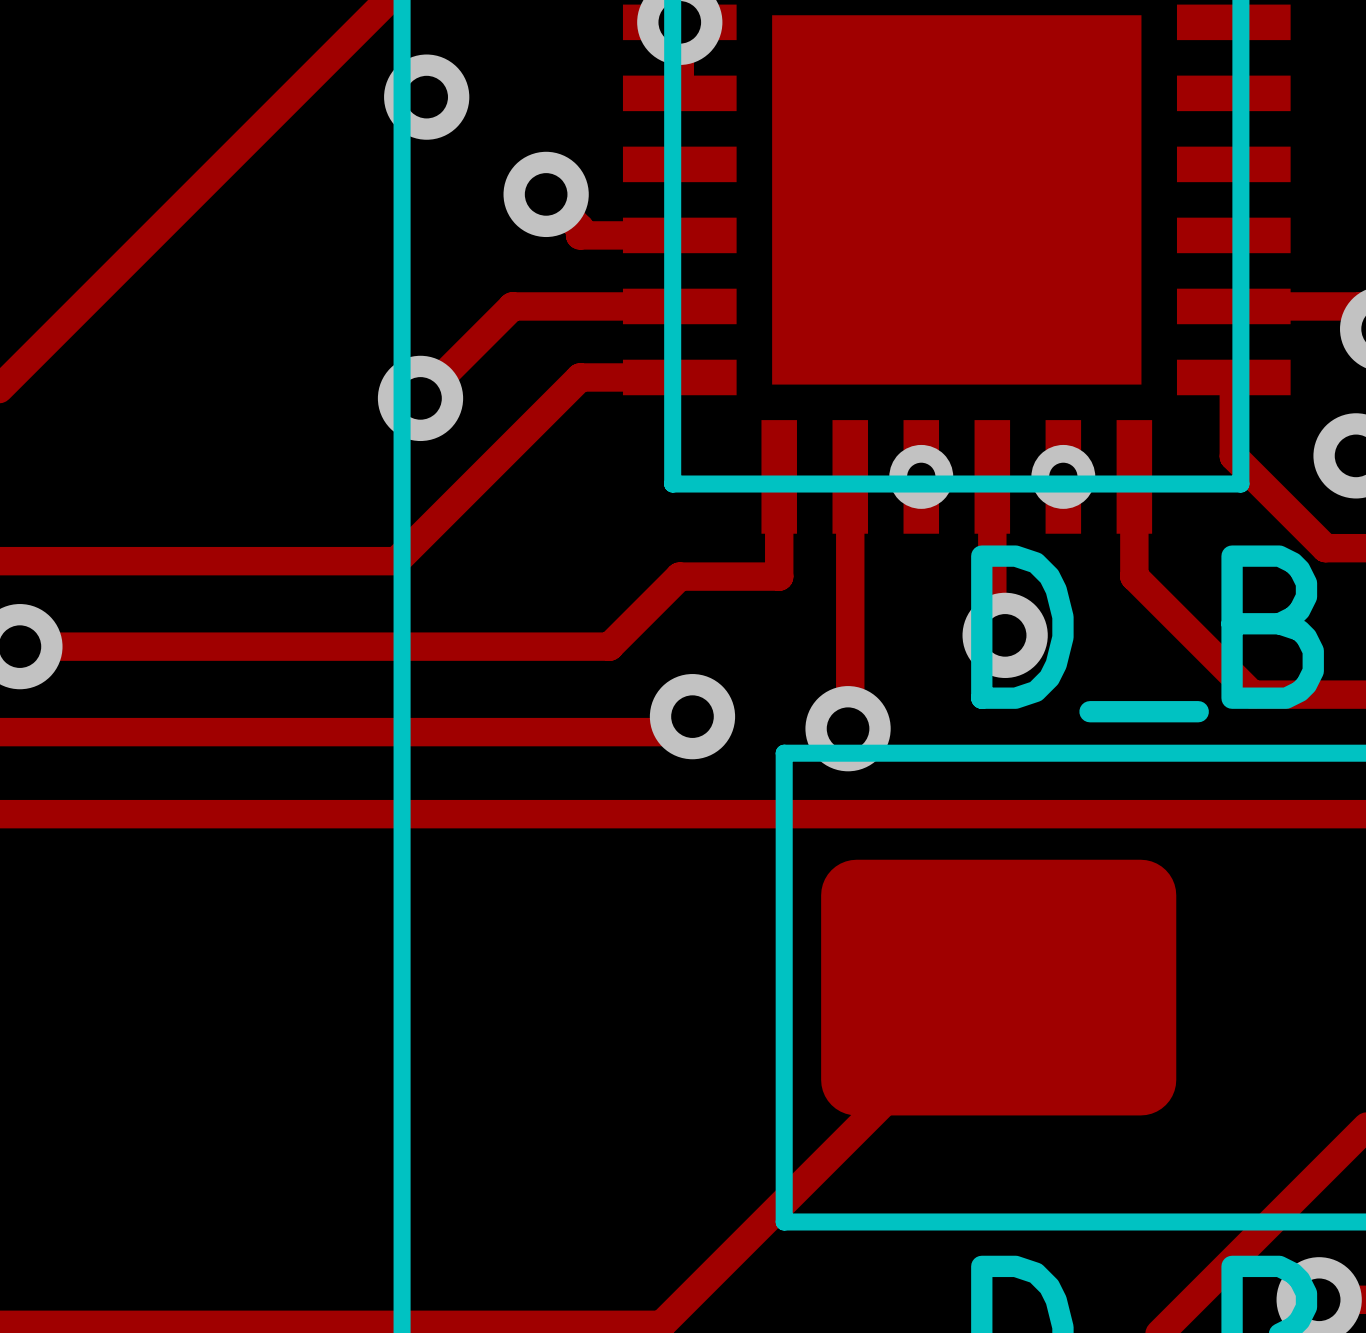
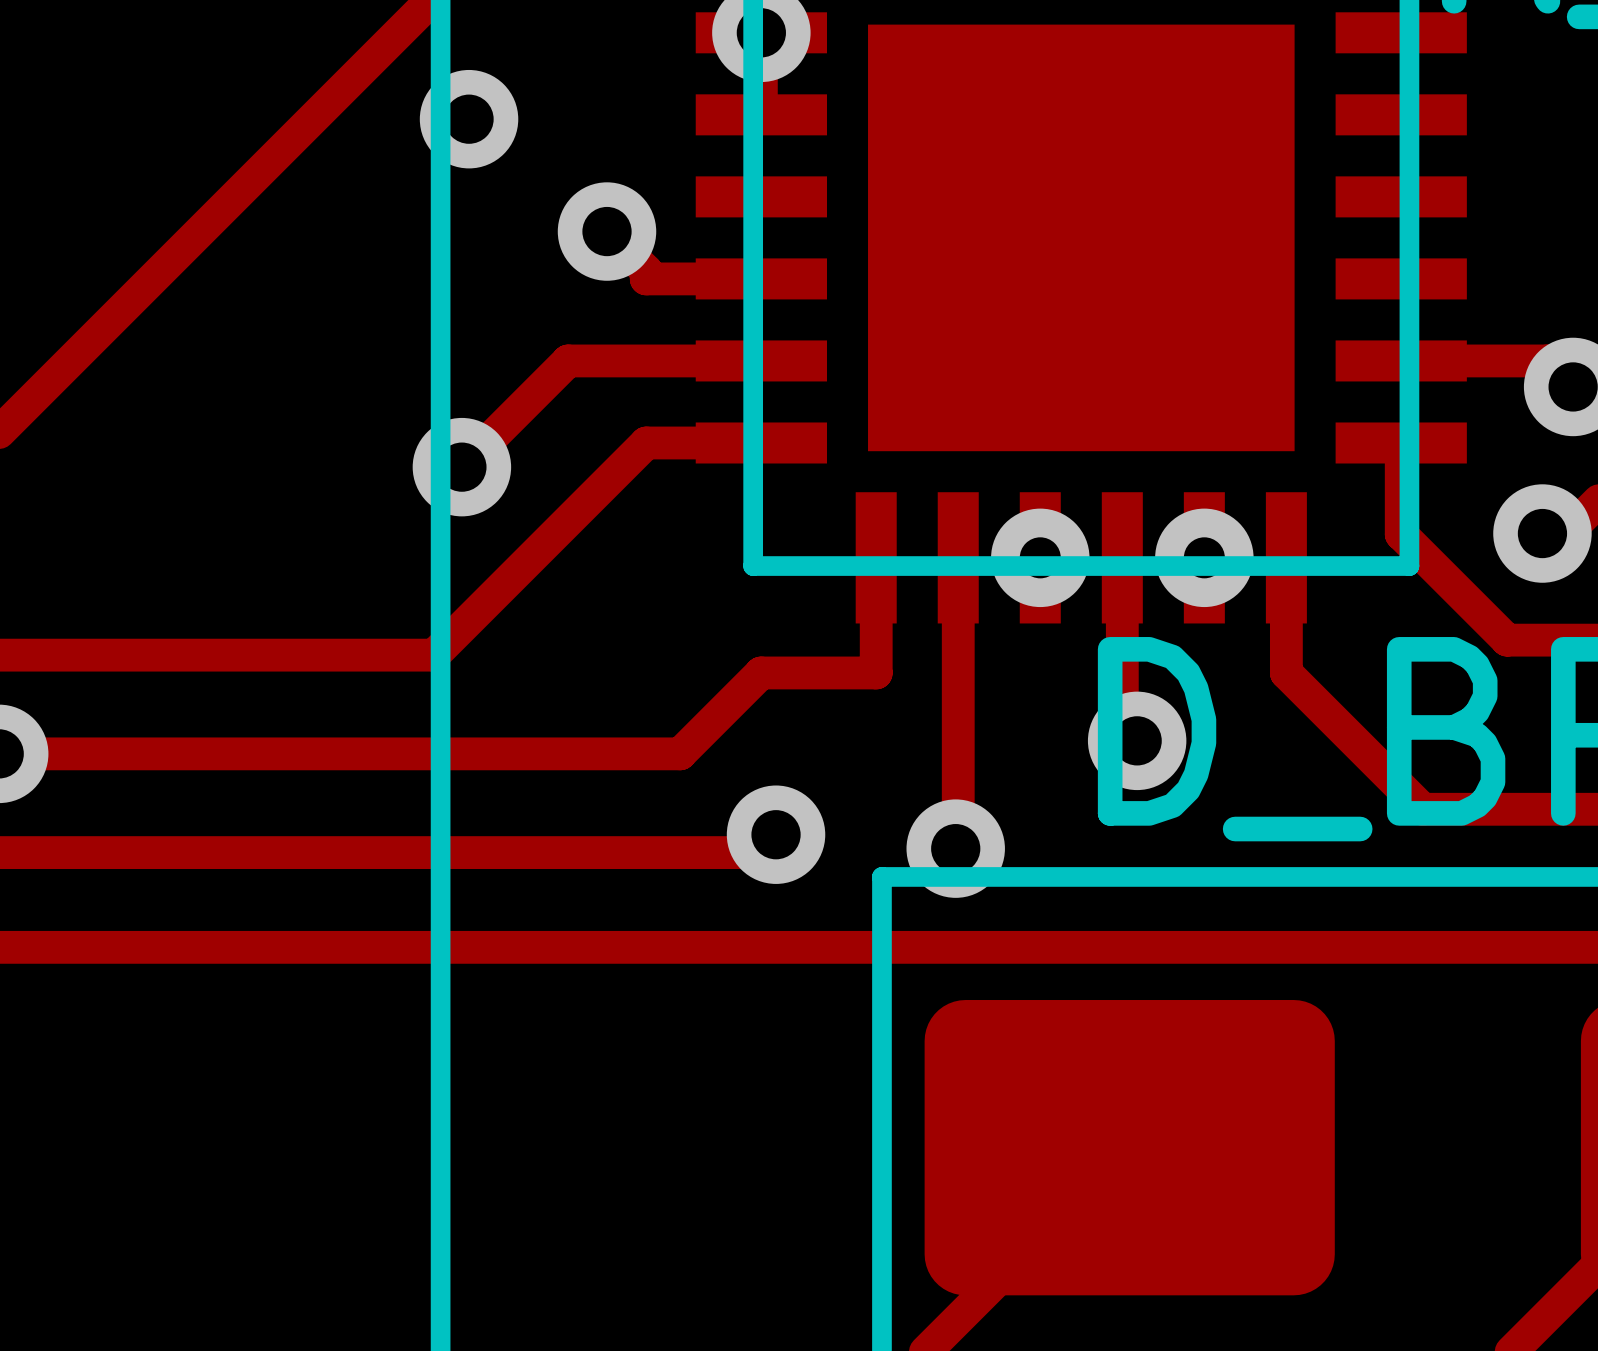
via size: [889, 444, 954, 509] -> [991, 508, 1090, 608]
via size: [1031, 444, 1096, 509] -> [1155, 508, 1254, 608]

